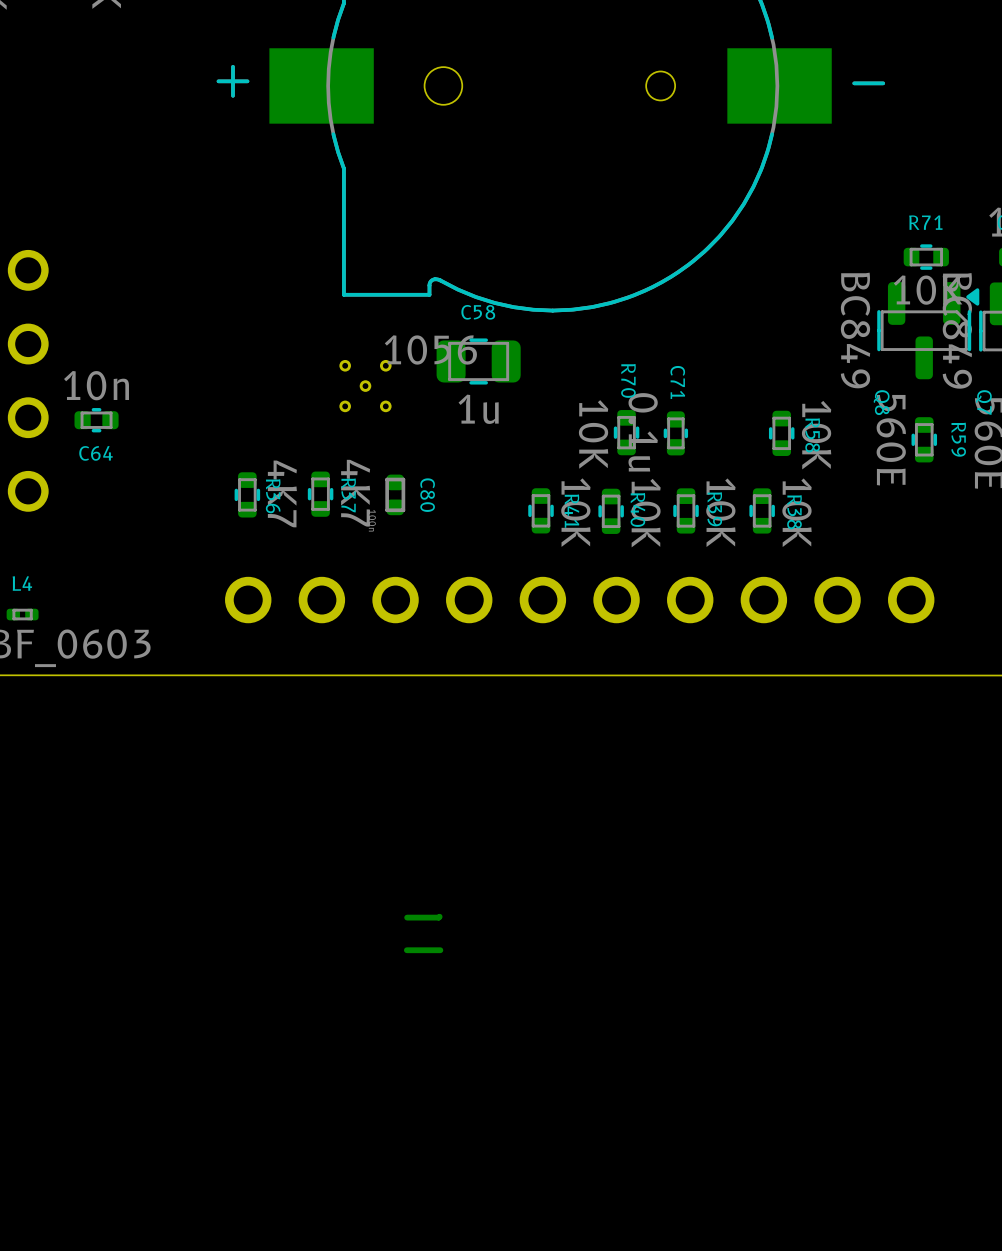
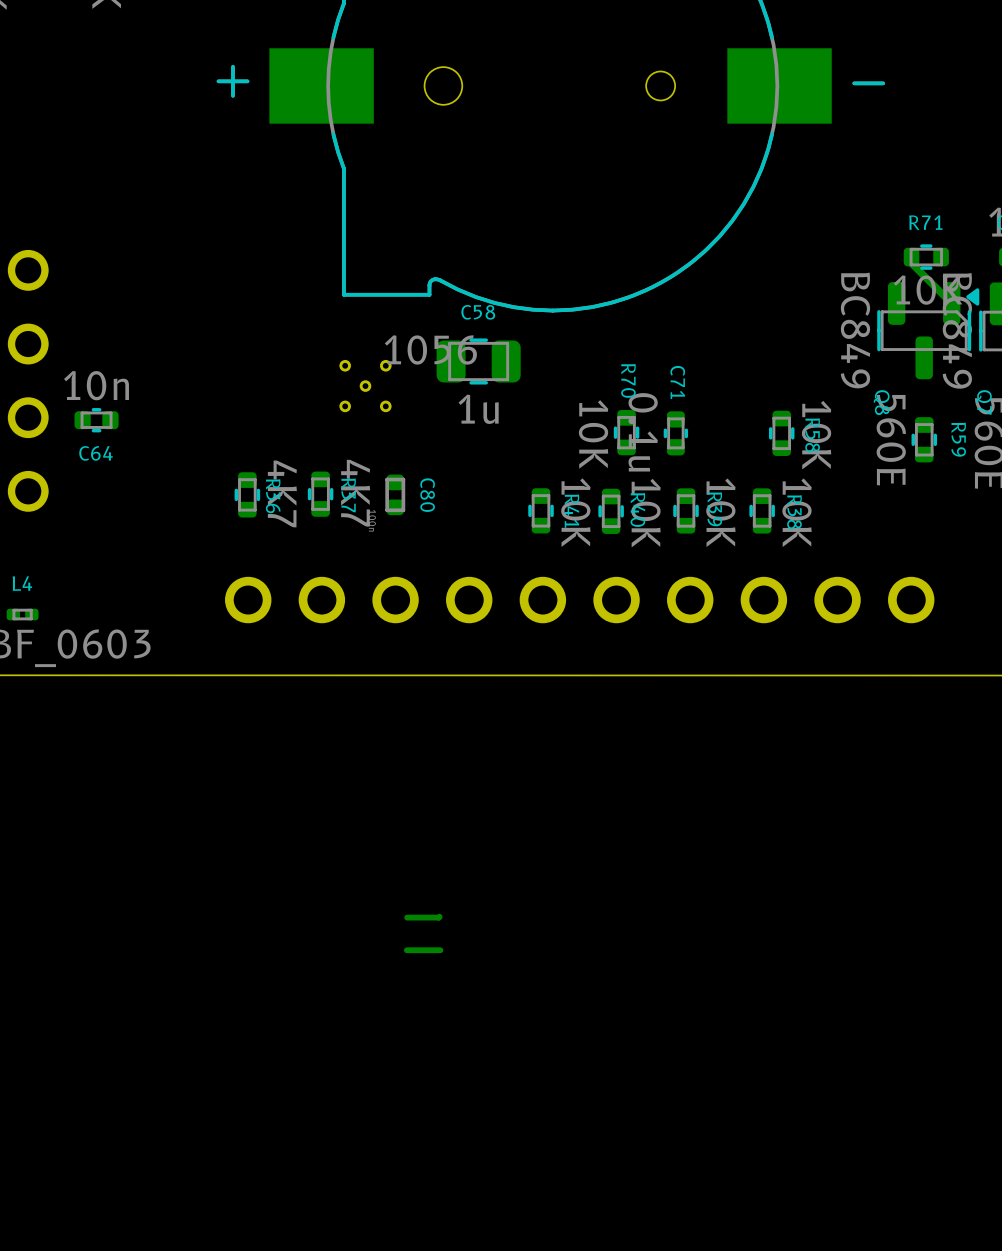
track: none -> (911, 257) (911, 263) (951, 303)

